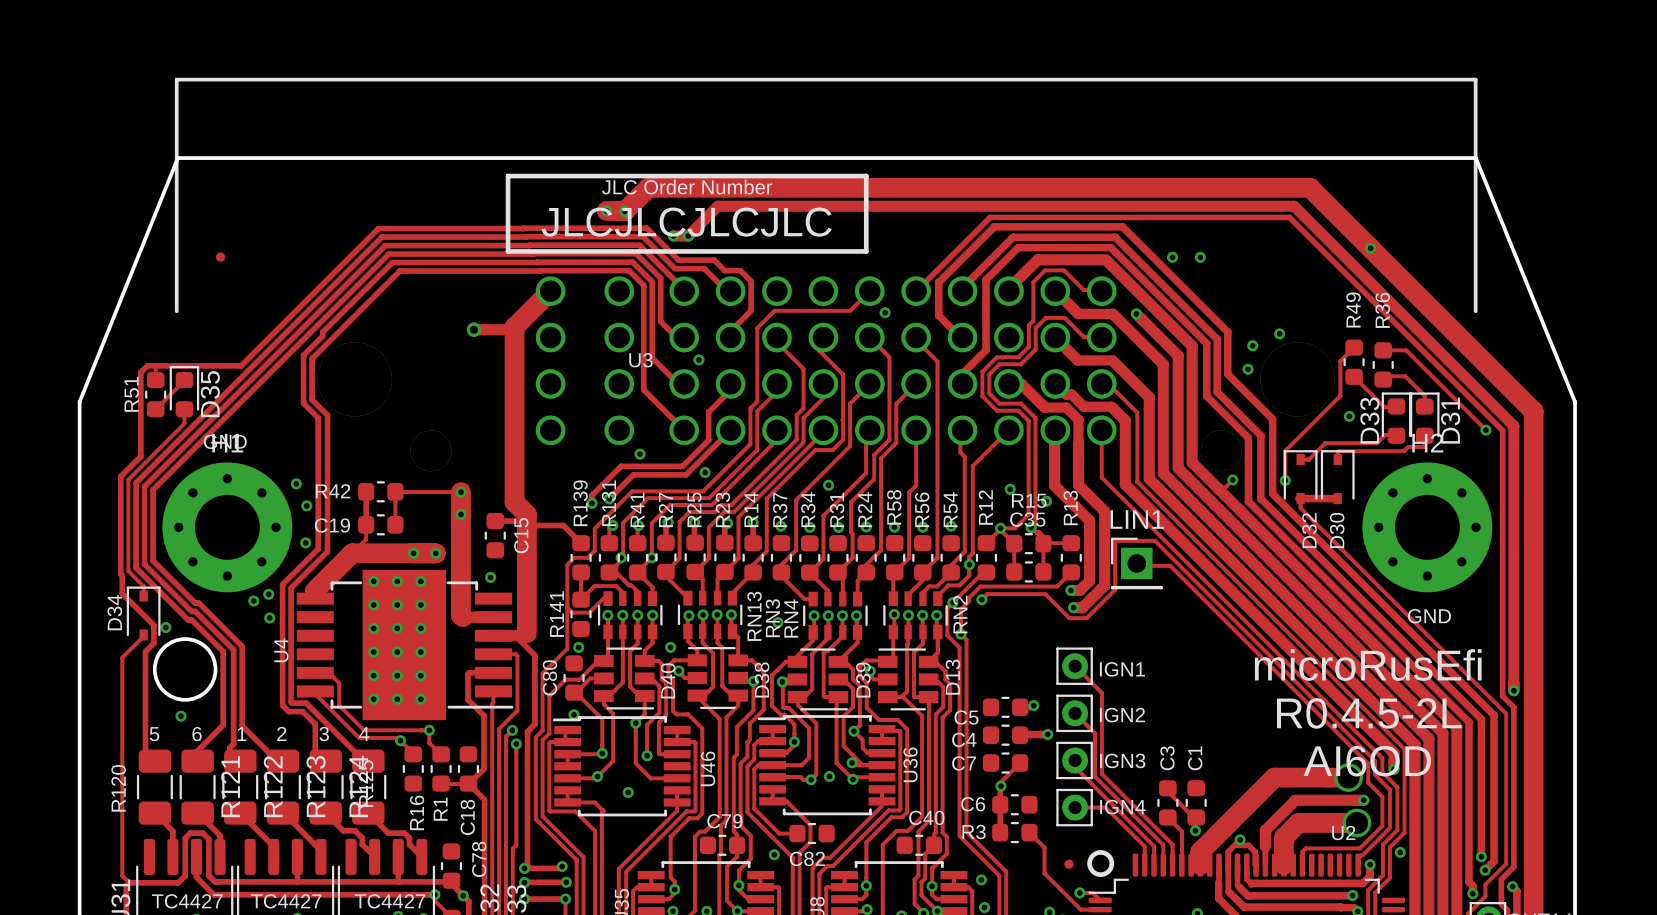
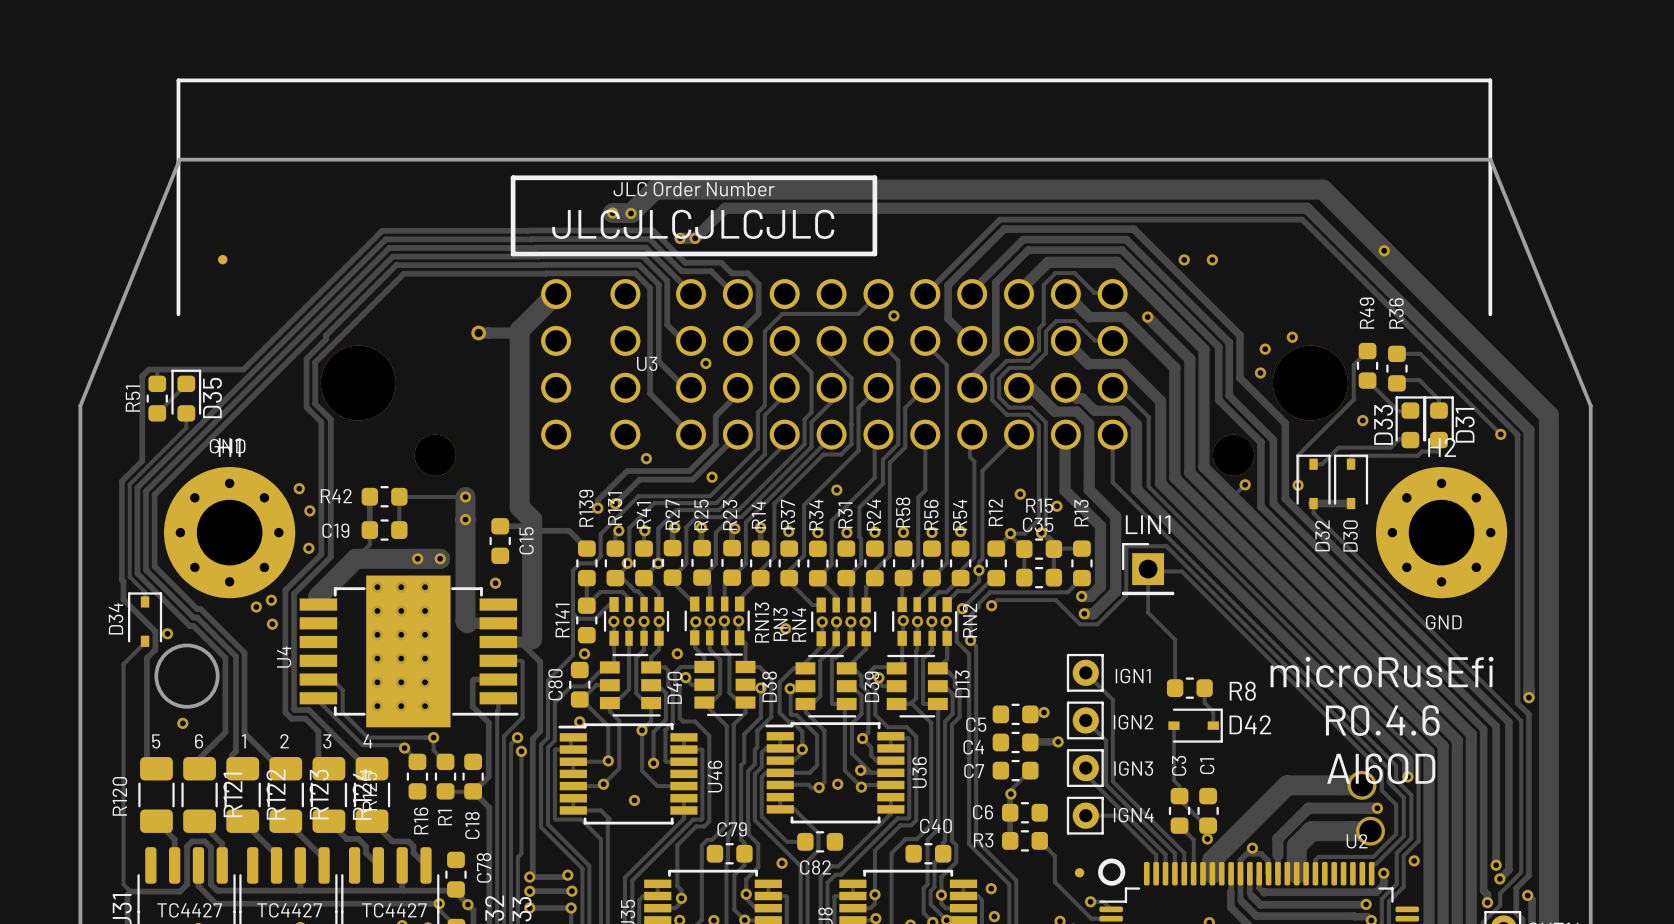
track: none -> (1148, 569) (1148, 612) (1175, 639) (1175, 688)
R8: none -> (1189, 688)
track: none -> (1204, 688) (1204, 702) (1213, 711) (1213, 725)
text: R0.4.5-2L (1369, 713) -> R0.4.6 (1382, 720)
track: none -> (1173, 725) (1173, 780) (1179, 786) (1179, 796)
D42: none -> (1195, 725)

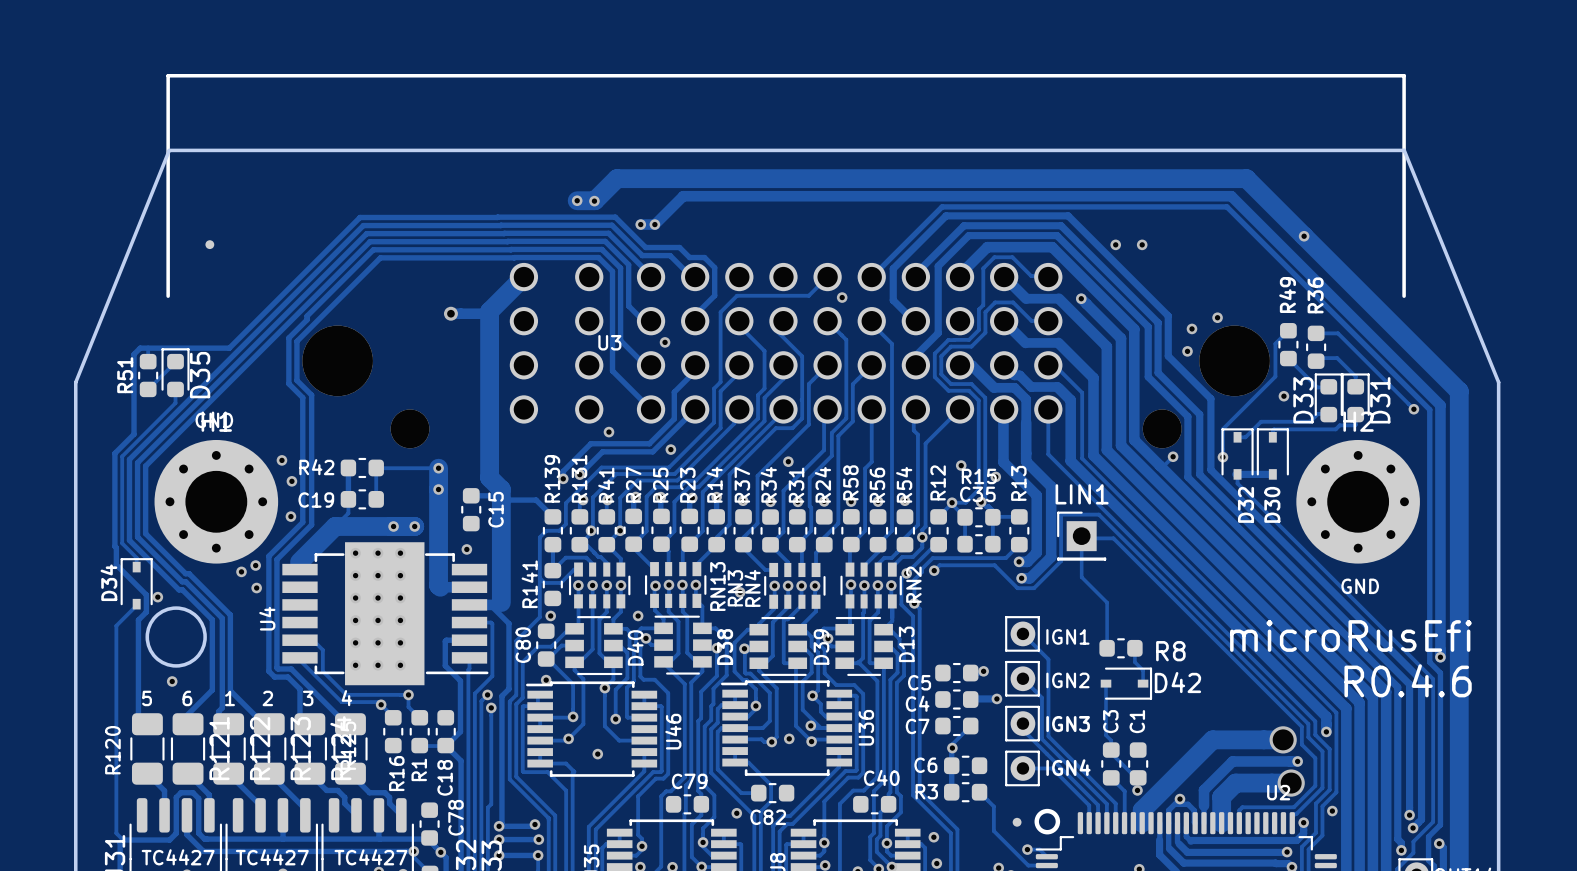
line: (513, 177) (874, 177) (874, 253) (513, 253) (513, 177) -> none
text: JLC Order Number (694, 189) -> none
text: JLCJLCJLCJLC (693, 224) -> none
text position: microRusEfi (1382, 672) -> microRusEfi (1350, 635)
text position: R0.4.6 (1382, 720) -> R0.4.6 (1408, 680)
text: AI6OD (1381, 768) -> none

